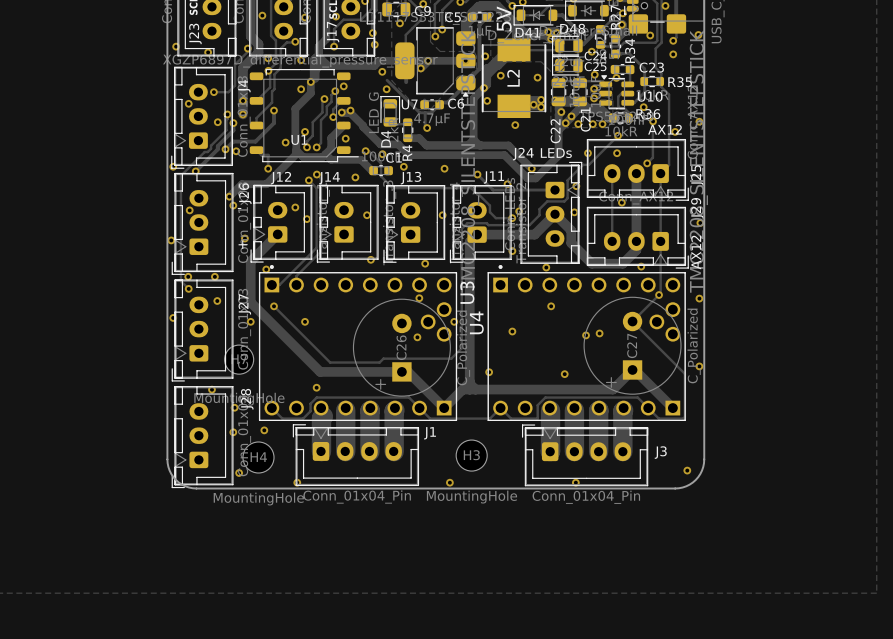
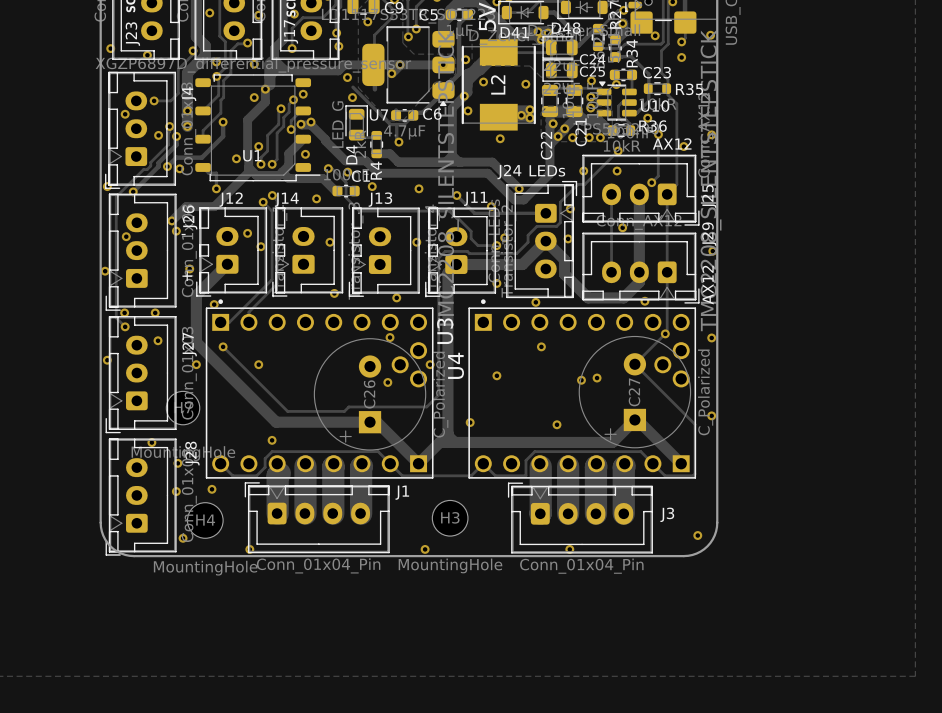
via: (591, 51) -> none

